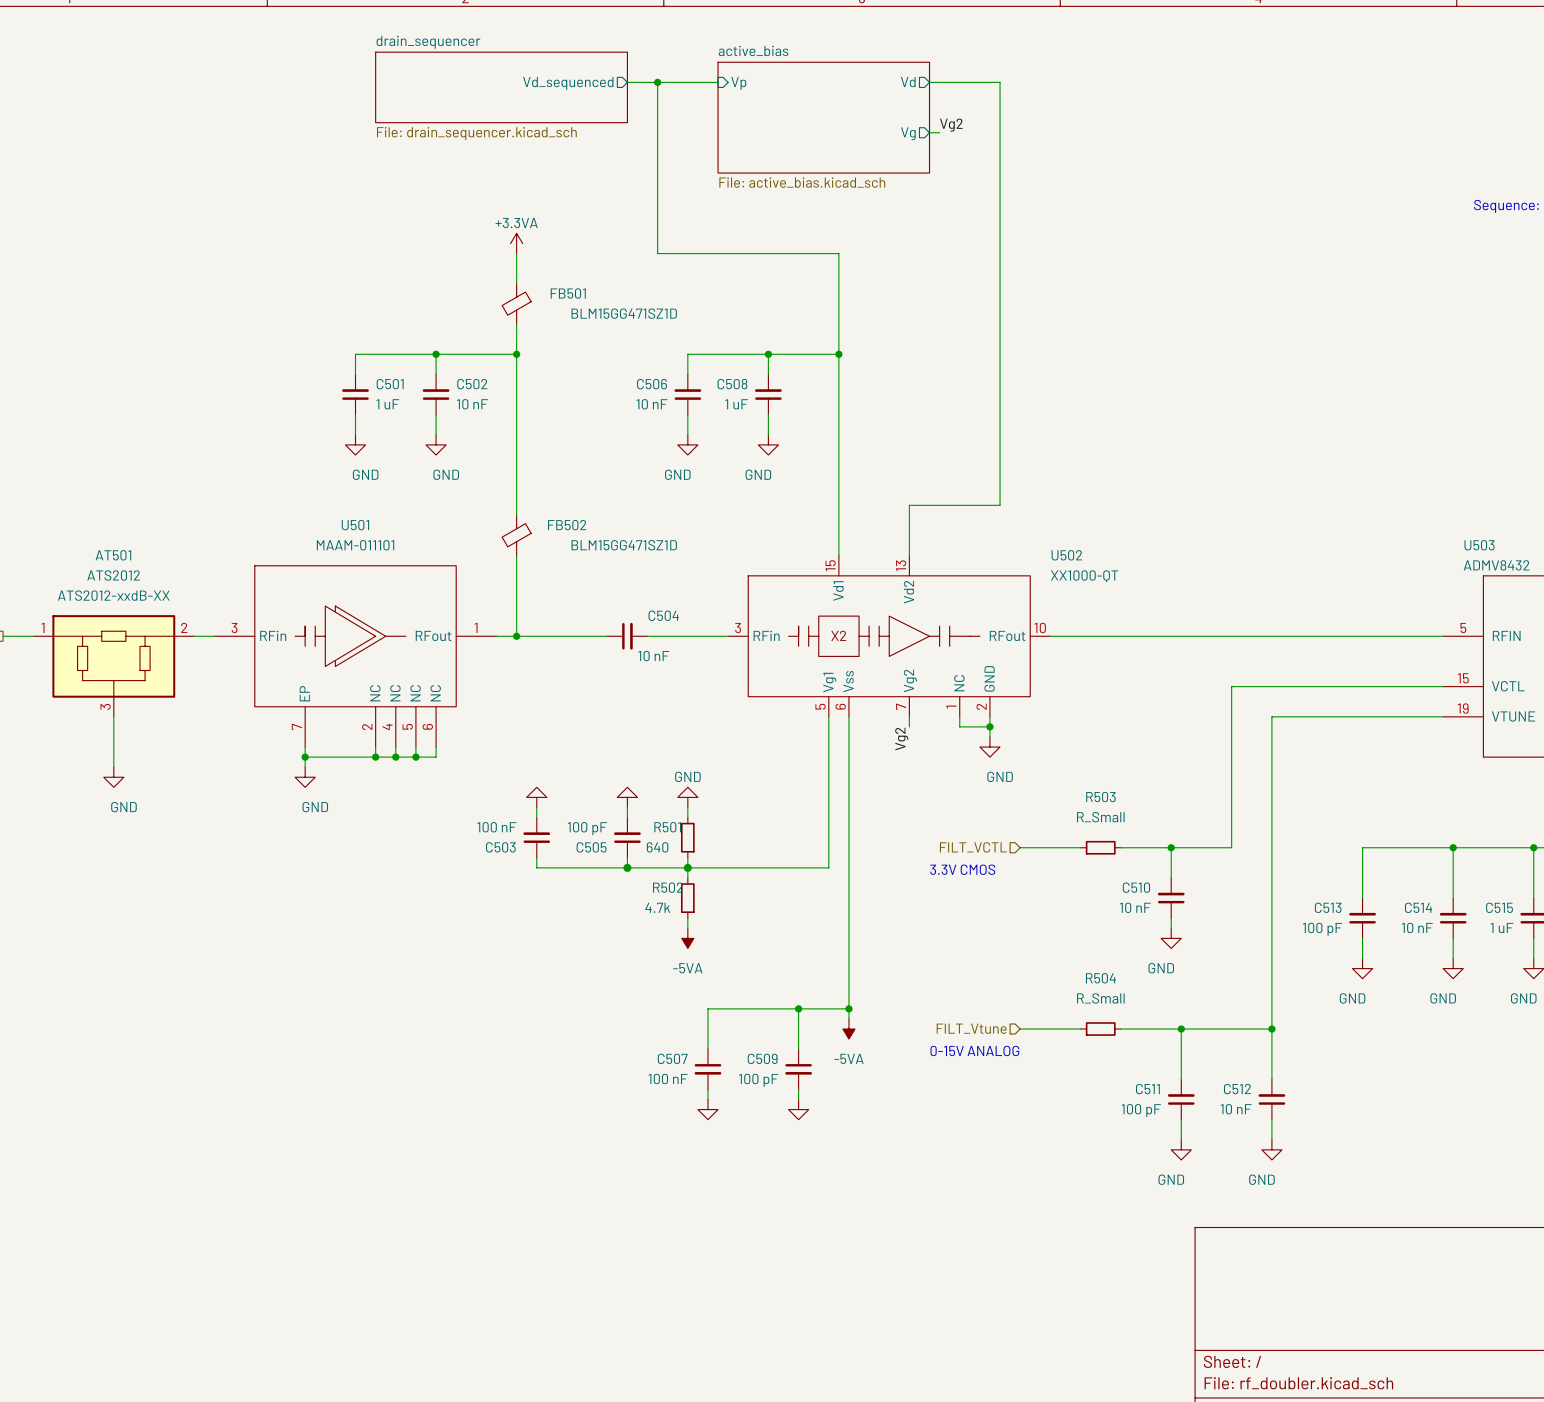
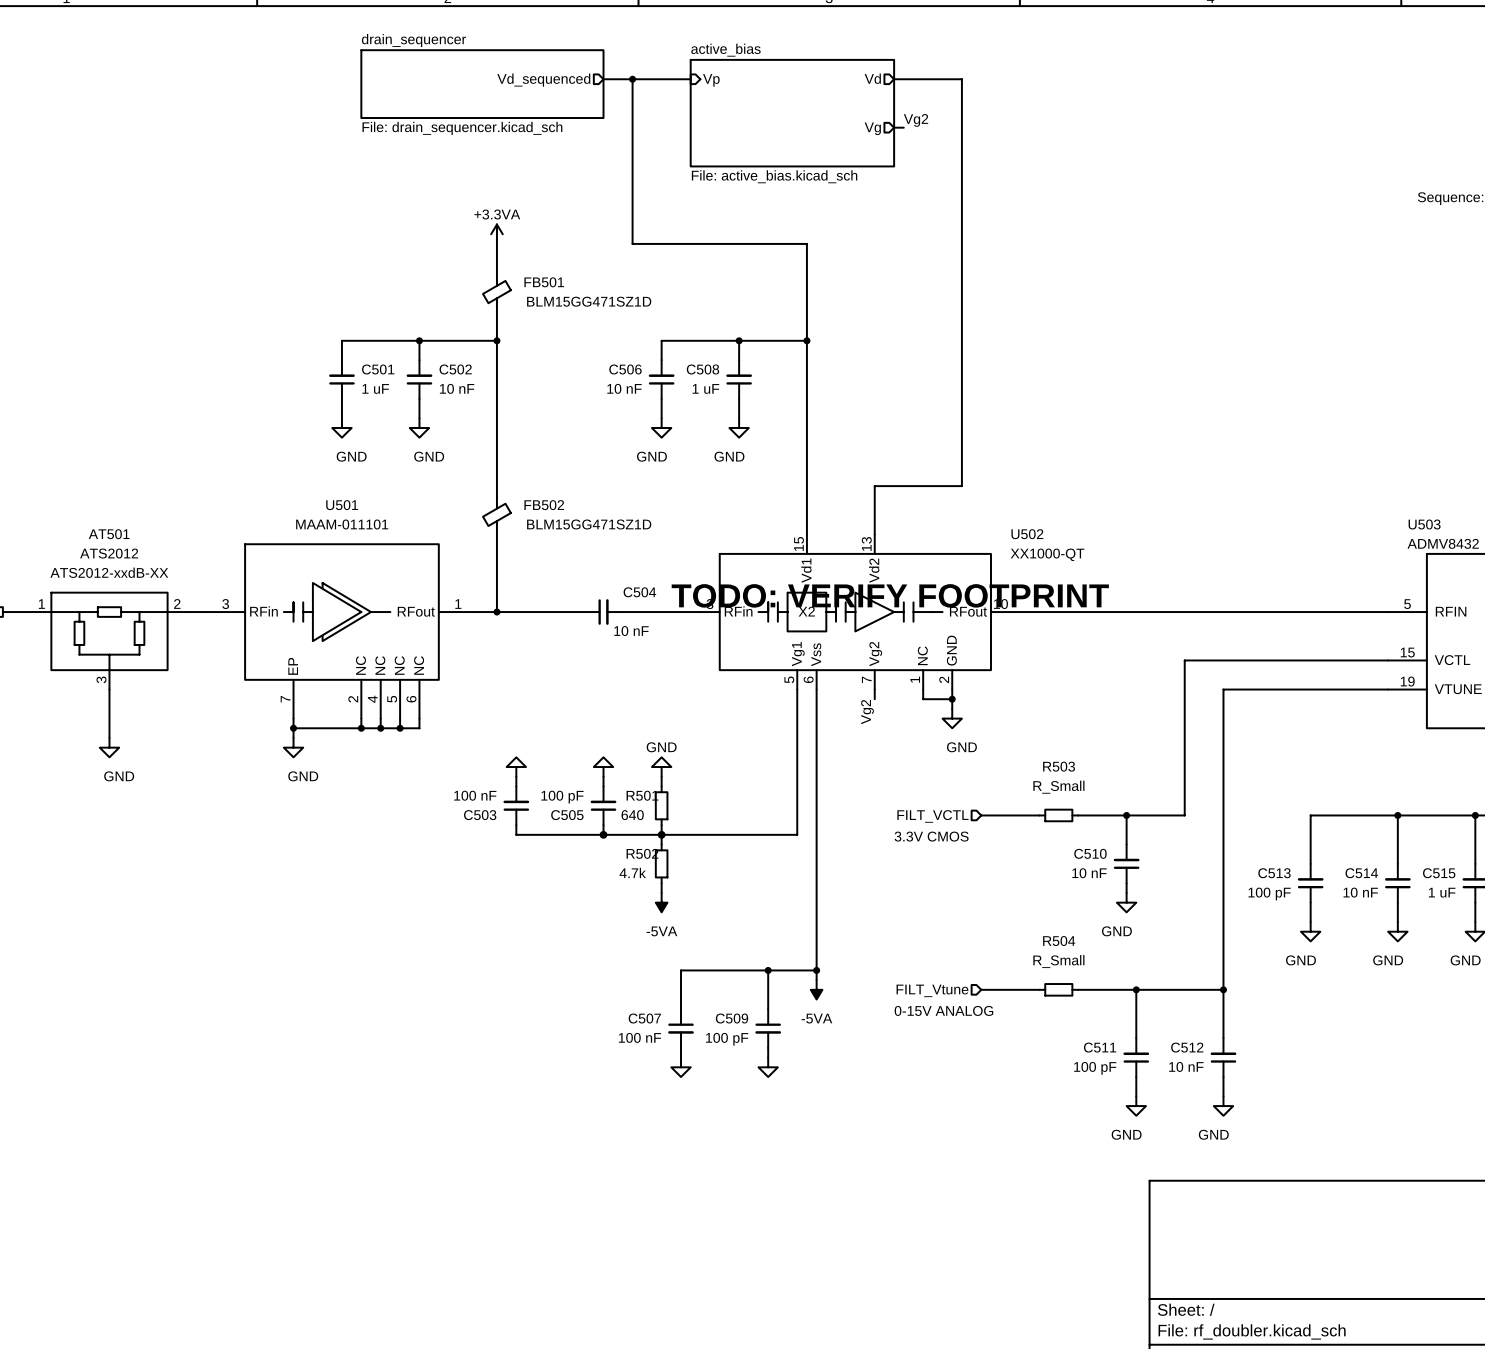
text: none -> TODO: VERIFY FOOTPRINT (890, 595)

